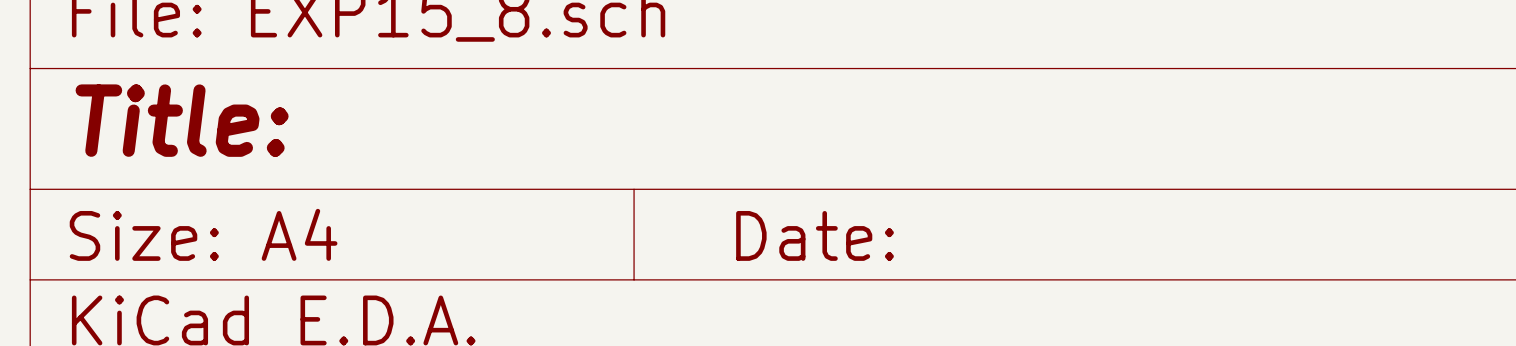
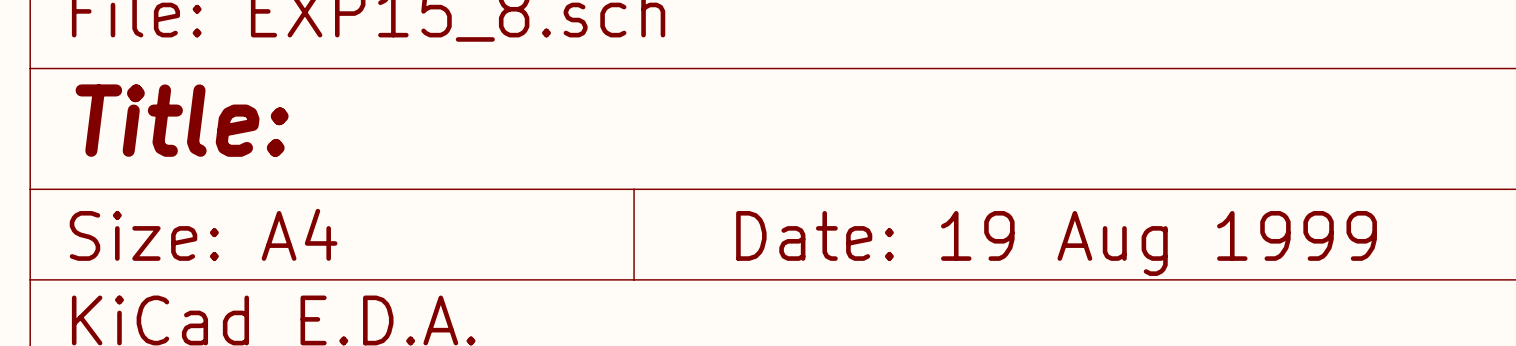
title block: Date: (814, 235) -> Date: 19 Aug 1999 (1056, 243)

